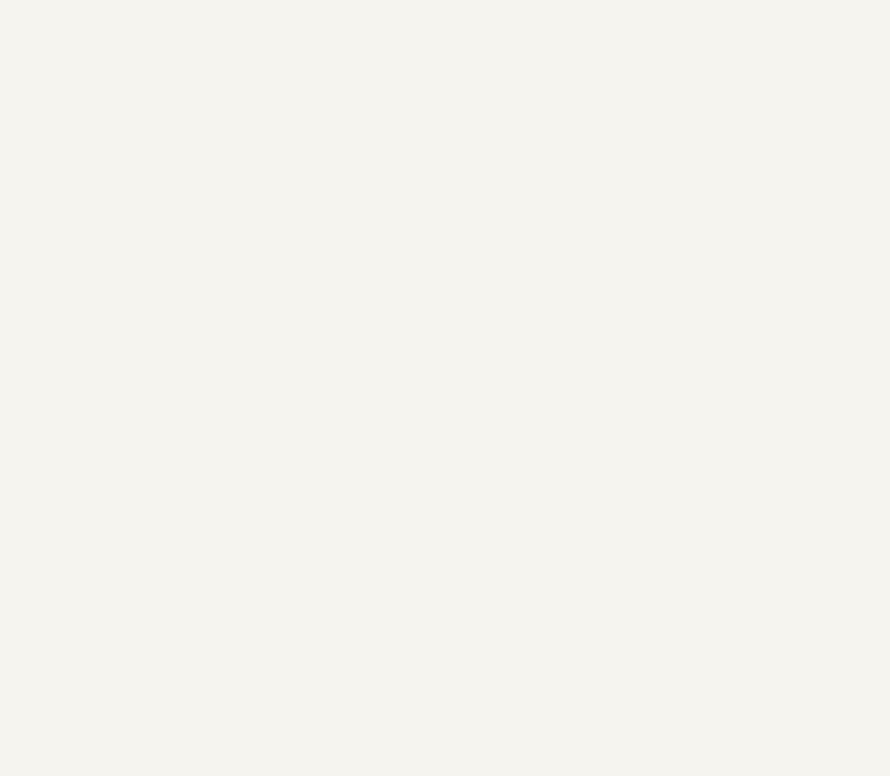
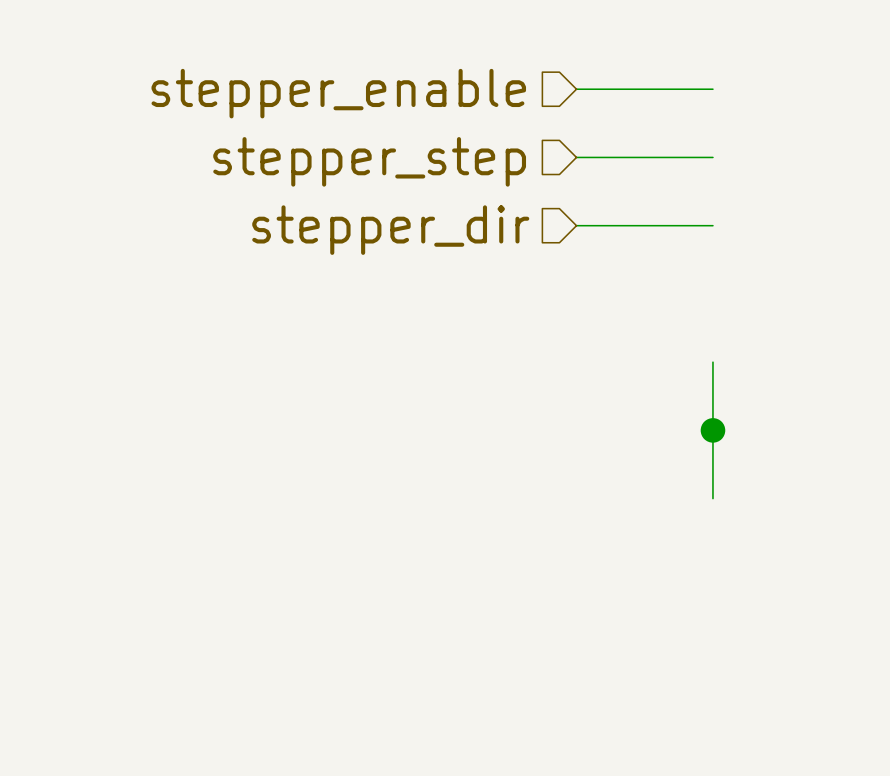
wire: none -> (576, 89) (712, 89)
hierarchical label: none -> stepper_enable (338, 93)
wire: none -> (576, 157) (712, 157)
hierarchical label: none -> stepper_step (369, 161)
wire: none -> (576, 225) (712, 225)
hierarchical label: none -> stepper_dir (390, 230)
wire: none -> (712, 362) (712, 498)
junction: none -> (712, 430)

